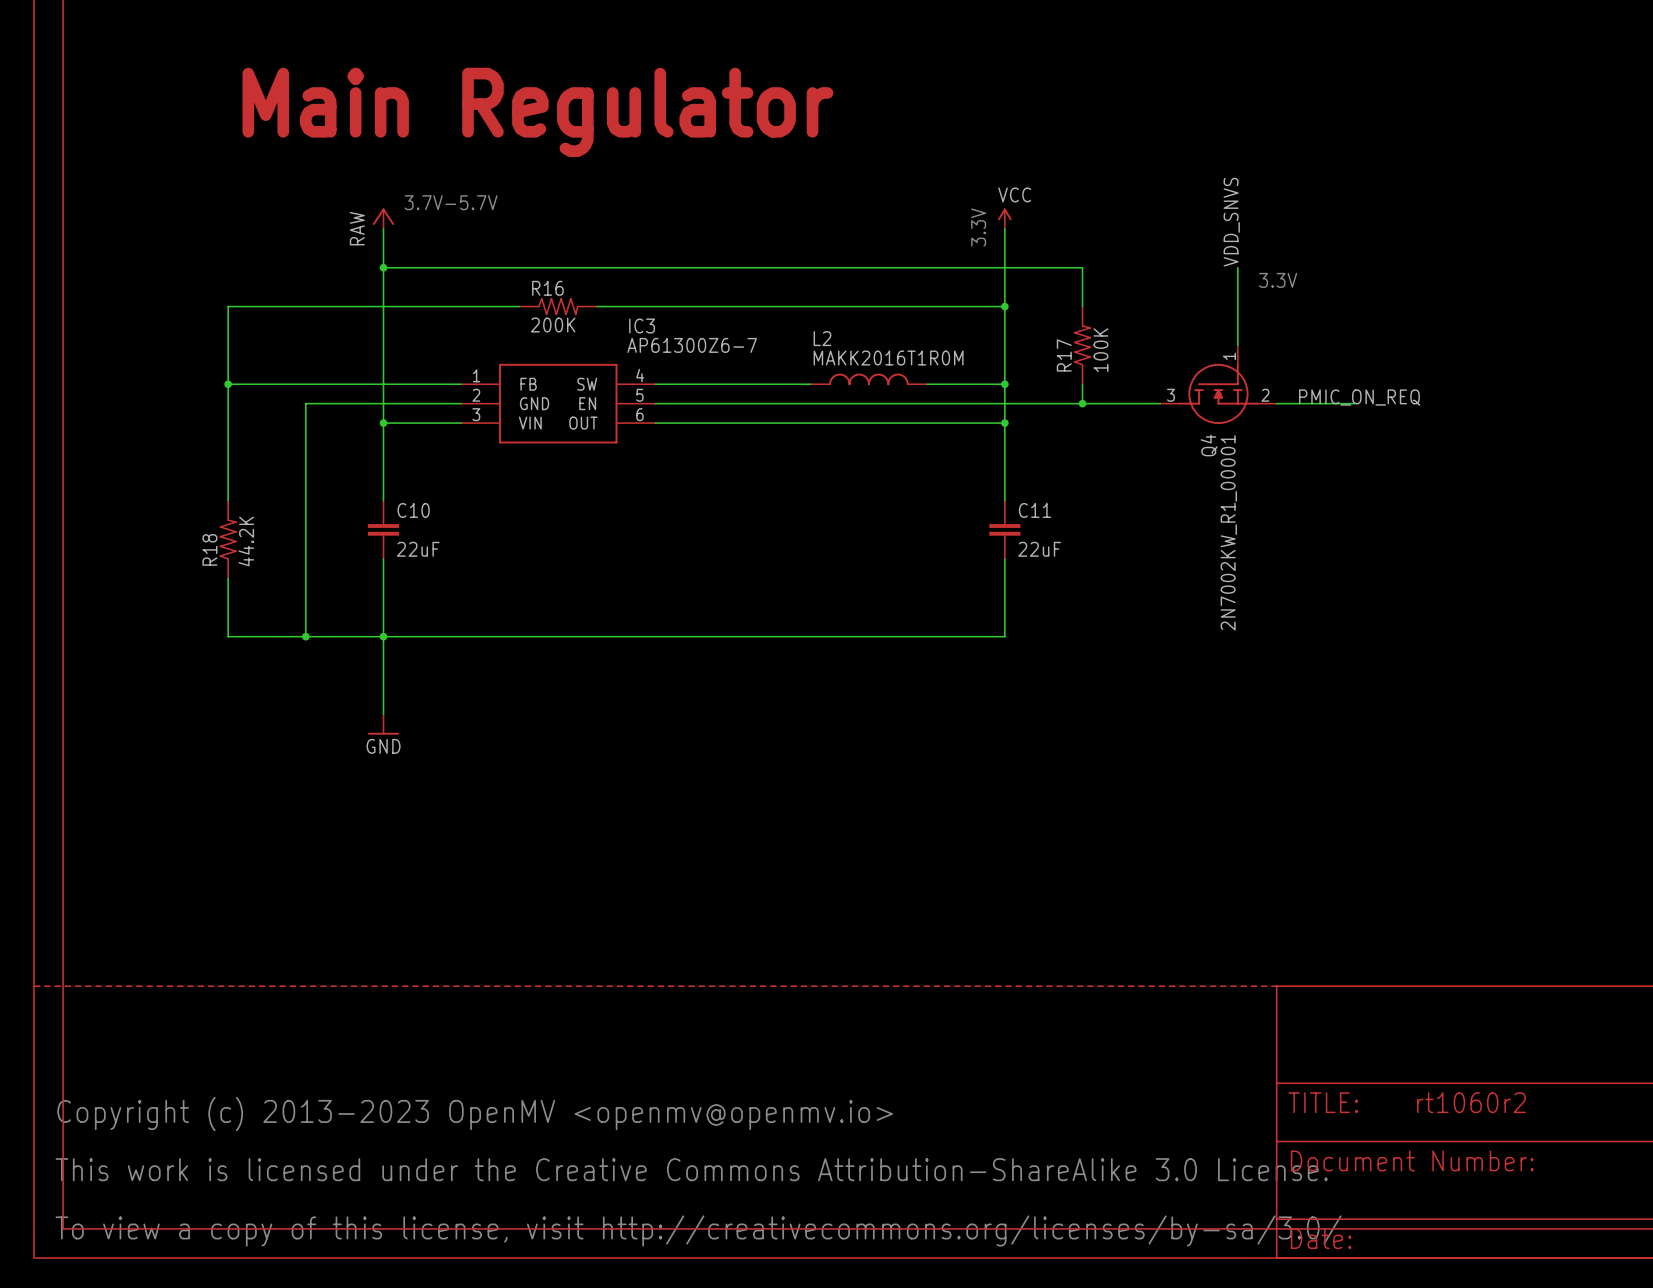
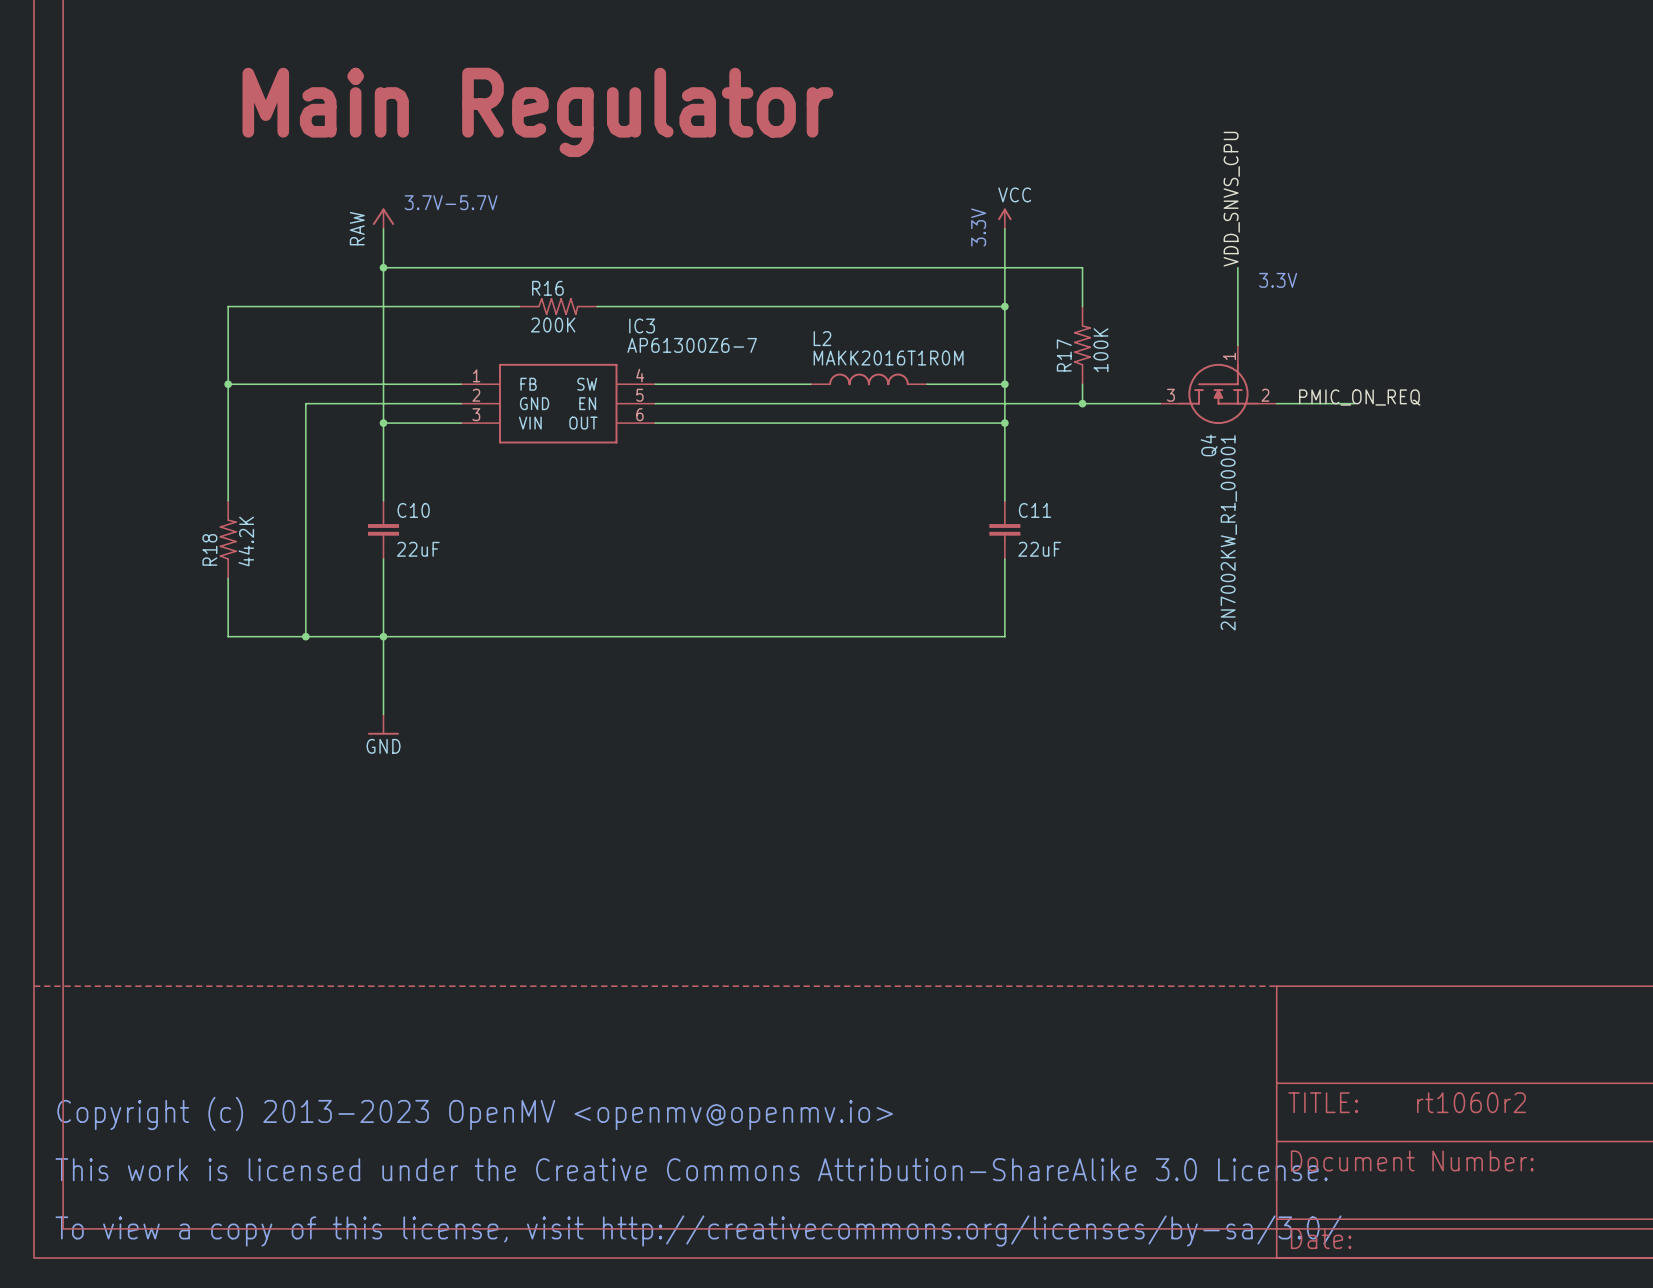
label: VDD_SNVS (1231, 222) -> VDD_SNVS_CPU (1231, 199)

